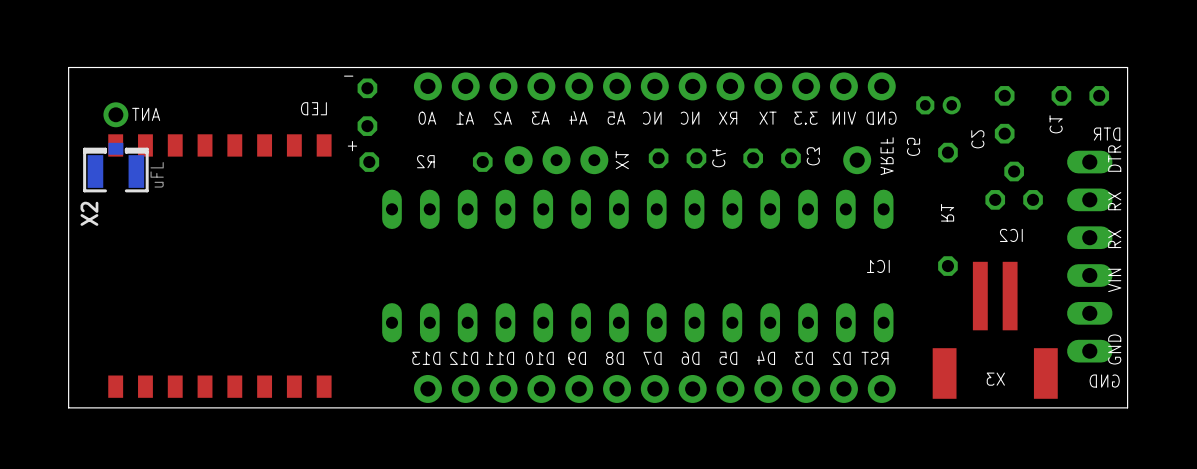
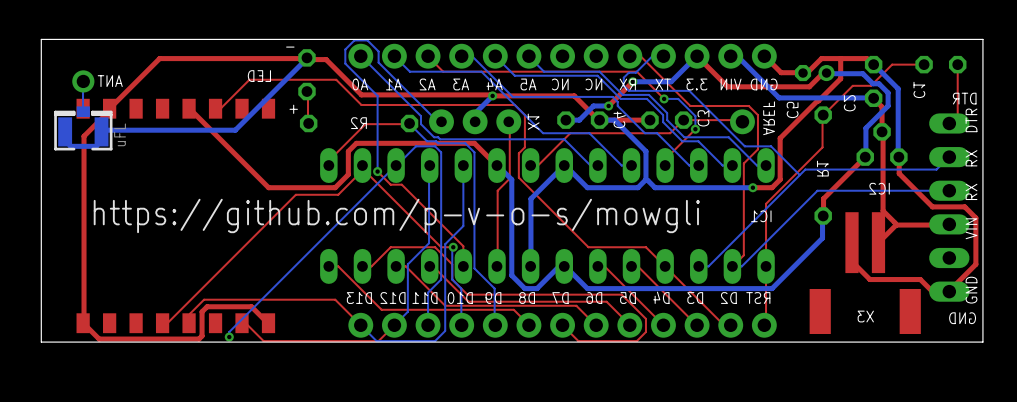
bottom track: none -> (360, 56) (420, 116) (420, 124) (434, 137) (440, 139) (564, 139) (590, 165) (597, 165)
bottom track: none -> (394, 56) (409, 71) (481, 71) (543, 133) (589, 133) (621, 165) (631, 165)
top track: none -> (428, 56) (443, 71) (636, 71) (664, 98)
bottom track: none -> (461, 56) (472, 56) (512, 96) (612, 96) (617, 101) (617, 105) (644, 133) (657, 133) (689, 165) (698, 165)
bottom track: none -> (495, 56) (514, 75) (597, 75) (620, 98) (646, 98) (663, 115) (663, 122) (682, 141) (698, 141) (722, 165) (732, 165)
bottom track: none -> (528, 56) (544, 71) (599, 71) (622, 94) (649, 94) (667, 113) (667, 120) (684, 137) (728, 137) (756, 165) (766, 165)
top track: none -> (629, 56) (640, 56) (690, 105) (748, 105) (757, 115) (757, 149) (743, 163) (743, 255) (732, 266)
bottom track: none -> (663, 56) (652, 56) (635, 72) (628, 72) (623, 77) (623, 85) (628, 90) (689, 90) (744, 146) (771, 146) (799, 175)
top track: none -> (697, 56) (727, 86) (809, 86) (822, 73) (826, 73)
bottom track: none -> (697, 56) (671, 81) (632, 81)
bottom track: none -> (730, 56) (737, 56) (779, 97) (873, 98)
top track: none -> (764, 56) (781, 72) (807, 72) (821, 58) (866, 58) (873, 64)
bottom track: none -> (306, 57) (235, 130) (103, 130) (101, 132) (101, 141) (96, 146) (70, 146) (65, 141) (65, 131)
top track: none -> (840, 58) (840, 78) (780, 138) (780, 179) (772, 187) (752, 187)
bottom track: none -> (873, 64) (898, 88) (898, 157)
top track: none -> (924, 64) (892, 64) (870, 85) (852, 85) (822, 115) (822, 147) (766, 203) (766, 323) (764, 325)
top track: none -> (957, 64) (957, 115) (949, 123)
bottom track: none -> (826, 73) (862, 73) (872, 83) (879, 83) (888, 92) (888, 105) (865, 128) (865, 157)
bottom track: none -> (83, 81) (83, 111)
top track: none -> (632, 81) (608, 105)
via: none -> (632, 81)
top track: none -> (306, 91) (308, 123)
bottom track: none -> (492, 95) (475, 113) (475, 121)
via: none -> (492, 95)
top track: none -> (873, 98) (882, 107) (883, 210) (896, 225)
bottom track: none -> (664, 98) (678, 98) (695, 116) (695, 129)
via: none -> (664, 98)
bottom track: none -> (608, 105) (593, 105) (579, 120) (565, 120)
via: none -> (608, 105)
top track: none -> (189, 108) (268, 187) (335, 187) (348, 174) (348, 151) (356, 143) (474, 143) (496, 165)
top track: none -> (215, 108) (221, 108) (249, 79) (336, 79) (361, 104) (514, 104) (524, 115) (524, 147) (518, 153) (518, 177) (588, 247) (645, 247) (723, 324) (730, 325)
bottom track: none -> (599, 120) (614, 120) (645, 151) (645, 179)
top track: none -> (650, 120) (599, 120) (574, 95) (361, 94) (326, 59) (306, 57) (159, 58) (84, 136) (83, 323) (99, 339) (199, 339) (202, 336) (202, 311) (207, 306) (251, 306) (268, 323)
bottom track: none -> (441, 121) (437, 121) (378, 62) (378, 51) (367, 40) (354, 40) (345, 49) (345, 63) (377, 95) (377, 171)
top track: none -> (508, 121) (509, 178) (497, 190) (496, 266)
top track: none -> (742, 121) (740, 120) (683, 120) (670, 133) (570, 133) (538, 165) (530, 165)
top track: none -> (409, 123) (365, 124) (329, 160) (328, 165)
bottom track: none -> (409, 123) (427, 141) (465, 143) (474, 152) (474, 268) (494, 288) (495, 325)
top track: none -> (695, 129) (665, 159) (665, 165)
via: none -> (695, 129)
top track: none -> (865, 157) (823, 198) (823, 215)
top track: none -> (898, 157) (899, 173) (932, 206) (964, 206) (975, 217) (975, 264) (949, 291) (932, 291) (920, 279) (869, 279) (852, 262) (852, 242)
bottom track: none -> (949, 157) (936, 169) (805, 169) (708, 266) (698, 266)
top track: none -> (362, 165) (362, 171) (365, 171) (441, 247) (453, 247)
bottom track: none -> (429, 165) (429, 243) (407, 264) (407, 311) (394, 325)
bottom track: none -> (463, 165) (463, 226) (445, 244) (445, 330) (435, 341) (376, 341) (360, 325)
bottom track: none -> (496, 165) (511, 179) (511, 275) (524, 288) (537, 288) (559, 266) (566, 267) (587, 288) (772, 288) (822, 238) (823, 215)
X2 name: X2 (89, 213) -> none
top track: none -> (362, 170) (338, 194) (295, 194) (167, 322) (162, 323)
top track: none -> (377, 171) (390, 184) (401, 184) (463, 246) (463, 266)
via: none -> (377, 171)
bottom track: none -> (645, 179) (637, 187) (587, 187) (564, 165) (530, 198) (530, 266)
bottom track: none -> (645, 179) (655, 187) (752, 187)
via: none -> (752, 187)
bottom track: none -> (949, 190) (817, 190) (741, 266) (732, 266)
text: none -> https://github.com/p-v-o-s/mowgli (396, 215)
top track: none -> (949, 224) (896, 225)
top track: none -> (896, 225) (878, 242)
bottom track: none -> (453, 247) (452, 279) (461, 288) (461, 325)
via: none -> (453, 247)
top track: none -> (328, 266) (338, 266) (381, 309) (513, 309) (528, 325)
top track: none -> (362, 266) (371, 266) (390, 247) (435, 247) (452, 264) (452, 279) (467, 294) (621, 294) (645, 318) (645, 331) (636, 341) (578, 341) (562, 325)
top track: none -> (396, 266) (405, 266) (445, 305) (576, 305) (596, 325)
top track: none -> (429, 266) (433, 266) (468, 301) (606, 301) (629, 325)
top track: none -> (597, 266) (604, 266) (663, 325)
top track: none -> (631, 266) (637, 266) (697, 325)
top track: none -> (189, 323) (189, 313) (204, 299) (335, 299) (360, 325)
top track: none -> (242, 323) (246, 323) (263, 341) (378, 341) (394, 325)
bottom track: none -> (428, 325) (428, 292) (441, 279) (441, 152) (435, 146) (415, 146) (229, 331) (229, 337)
via: none -> (229, 337)

